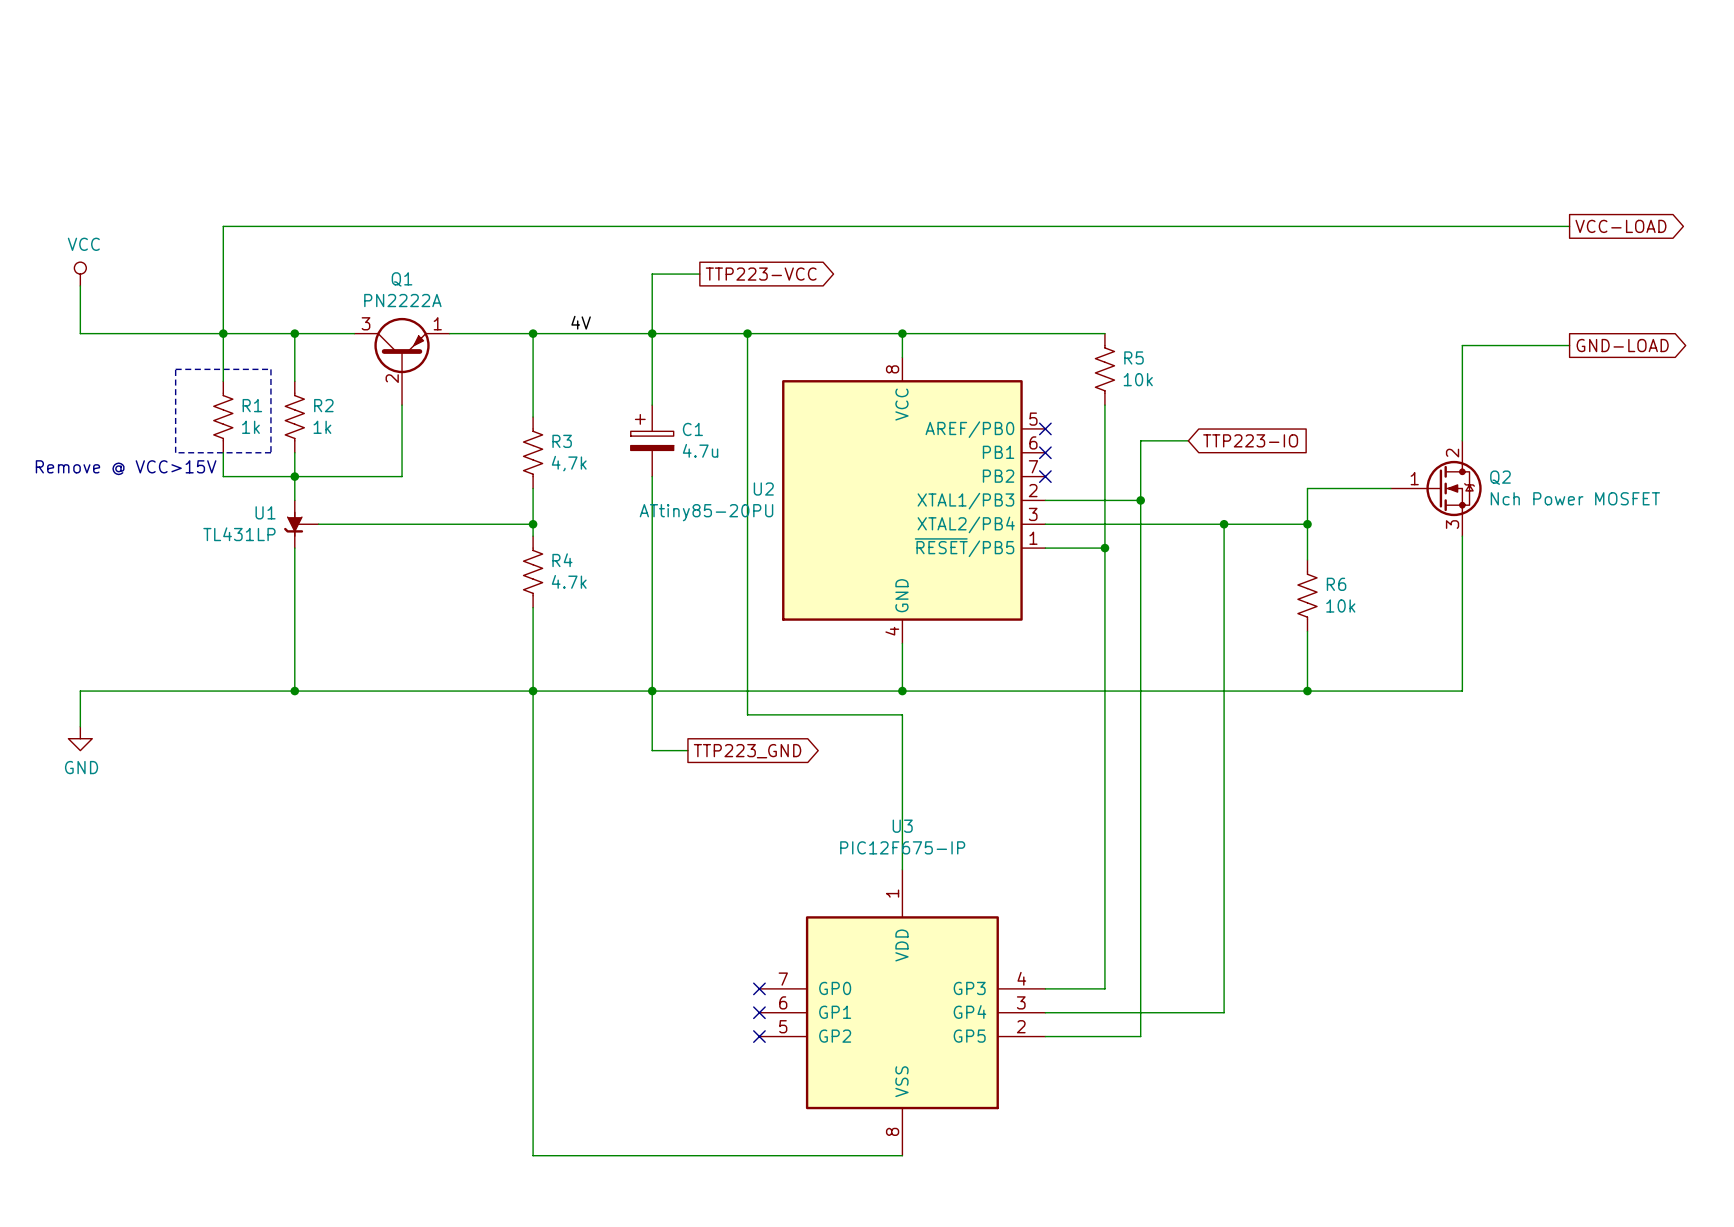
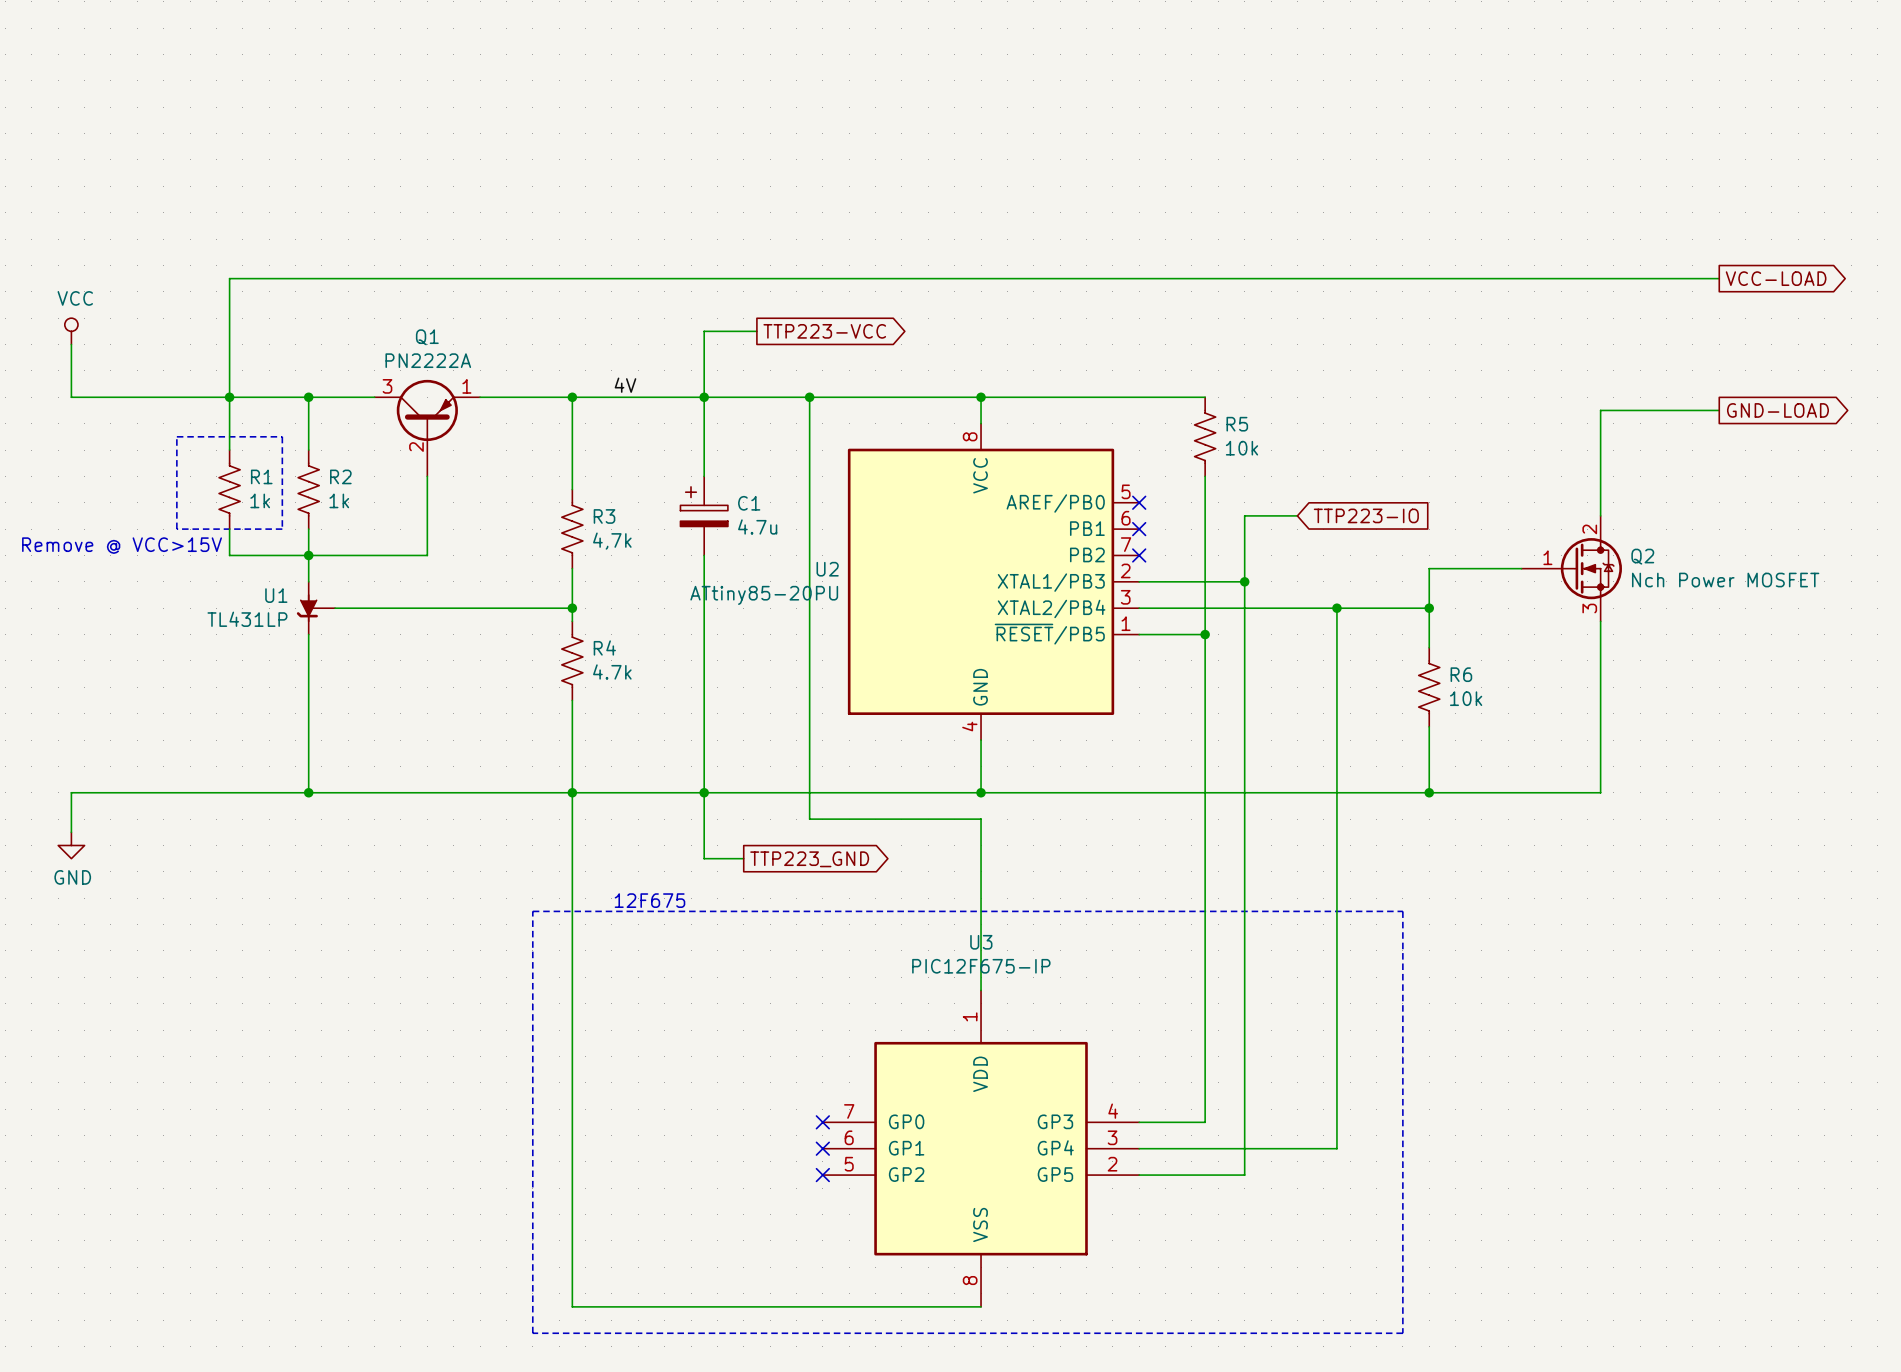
text: none -> 12F675 (649, 900)
line: none -> (532, 911) (1402, 911) (1402, 1333) (532, 1333) (532, 911)

